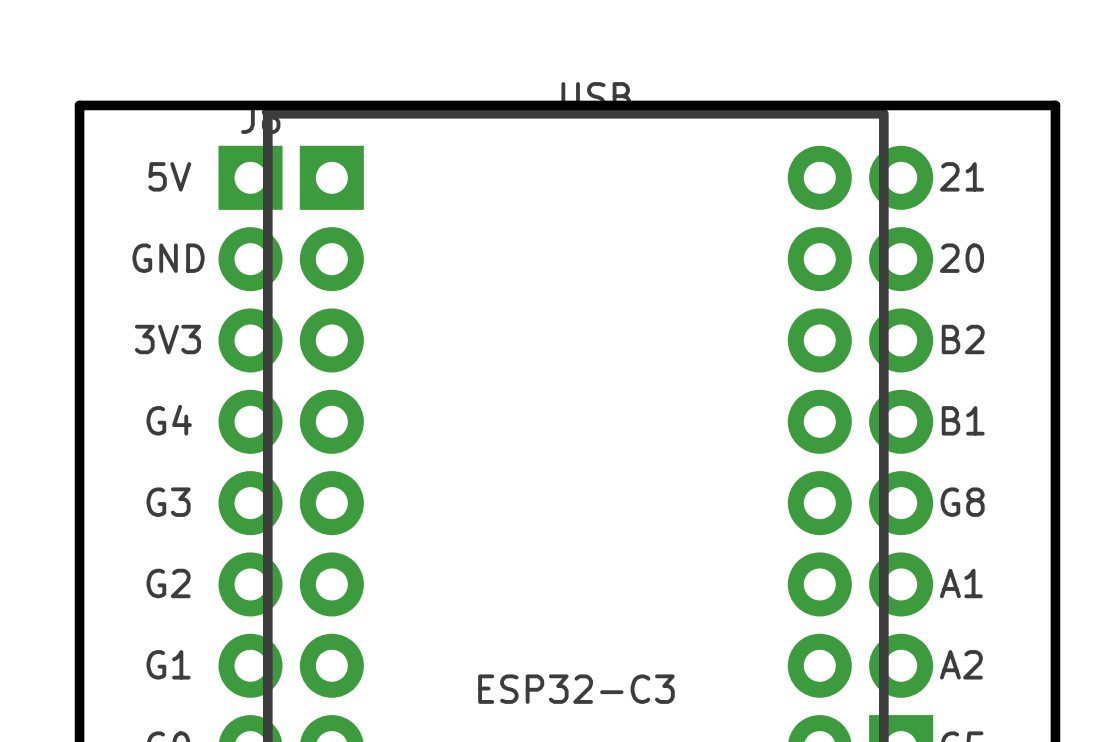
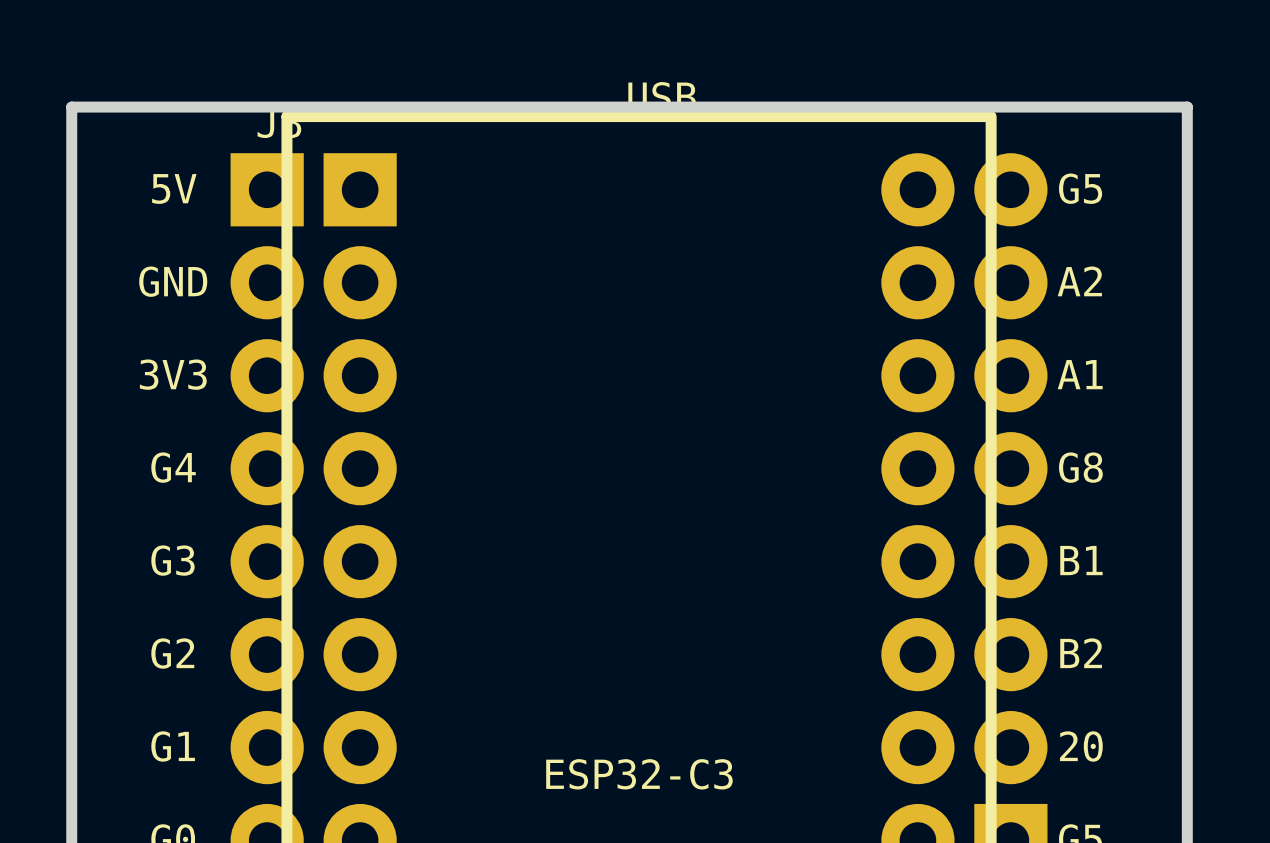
text: 21 (961, 176) -> G5 (1080, 188)
text: 20 (961, 258) -> A2 (1079, 281)
text: B2 (963, 339) -> A1 (1080, 374)
text: B1 (963, 420) -> G8 (1080, 467)
text: G8 (962, 502) -> B1 (1081, 560)
text: A1 (961, 583) -> B2 (1081, 653)
text: A2 (961, 664) -> 20 (1081, 746)

